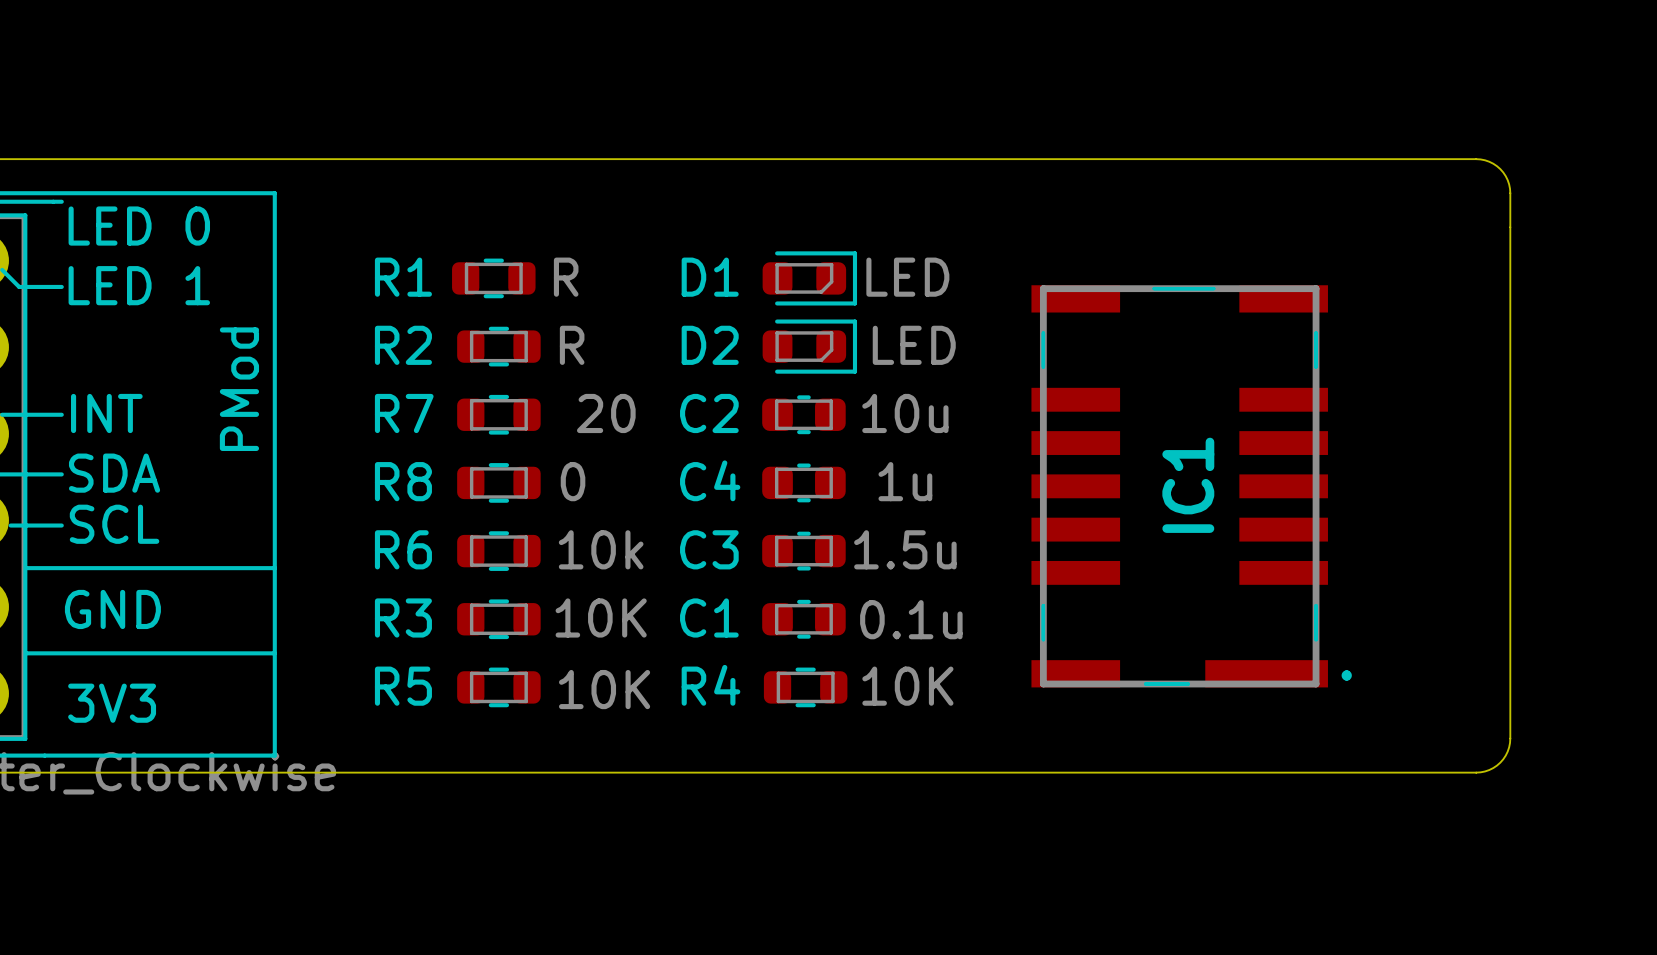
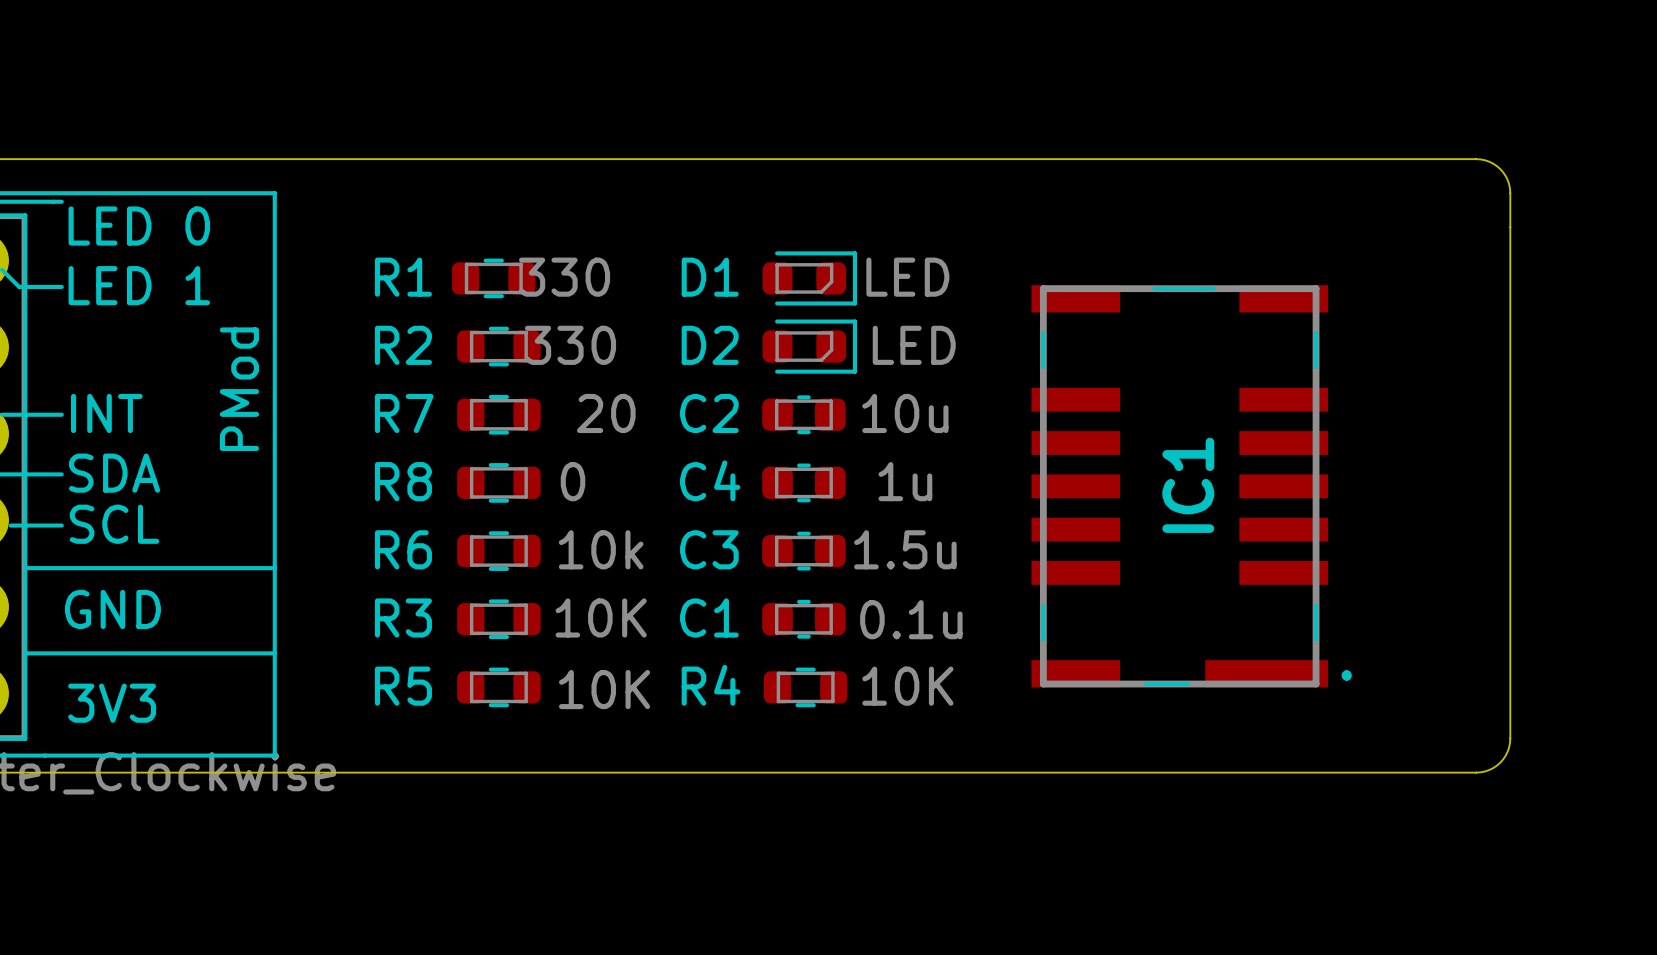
R1 value: R (566, 277) -> 330 (564, 277)
R2 value: R (572, 345) -> 330 (570, 345)

